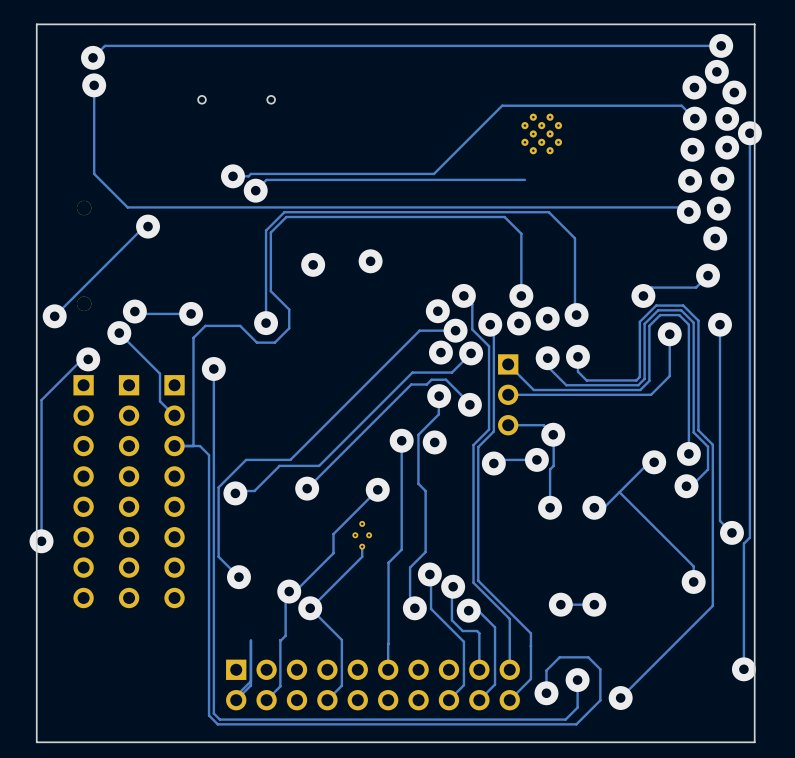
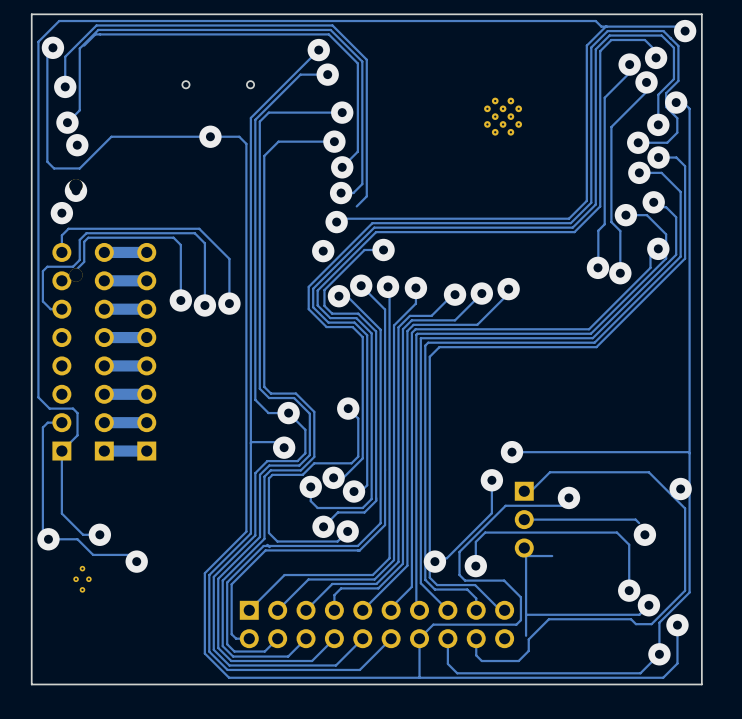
track: none -> (605, 26) (586, 45) (586, 200) (568, 218) (344, 218) (341, 222) (336, 222)
track: none -> (685, 31) (680, 26) (601, 26) (595, 21) (59, 21) (38, 41) (38, 397) (49, 408) (73, 408) (77, 413) (77, 435) (61, 451) (61, 513) (83, 534) (99, 534)
via: none -> (685, 31)
track: (721, 45) (355, 45) -> (342, 167) (357, 151) (357, 63) (328, 34)
via: (721, 45) -> none
via: (92, 57) -> none
track: none -> (52, 47) (47, 53) (47, 161) (54, 168) (79, 168) (111, 136) (239, 136) (246, 143) (246, 531) (204, 573) (204, 653) (229, 677) (663, 677) (677, 663) (677, 625)
via: none -> (52, 47)
track: none -> (318, 50) (250, 117) (250, 533) (209, 575) (209, 651) (227, 669) (359, 669) (391, 638)
via: none -> (318, 50)
track: none -> (656, 57) (656, 51) (644, 40) (611, 40) (600, 51) (600, 206) (574, 232) (376, 232) (317, 290) (317, 305) (330, 318) (356, 318) (371, 333) (371, 499) (362, 508) (317, 508) (310, 501) (310, 486)
via: none -> (656, 57)
via: (716, 71) -> none
track: none -> (629, 64) (629, 72) (604, 97) (604, 224) (598, 230) (598, 262)
via: none -> (629, 64)
track: (94, 85) (94, 173) (127, 207) (684, 207) (688, 211) -> none
via: (94, 85) -> none
via: (694, 87) -> none
track: none -> (327, 74) (300, 74) (255, 119) (255, 399) (268, 413) (288, 413) (305, 429) (305, 453) (297, 461) (267, 461) (255, 473) (255, 535) (213, 576) (213, 649) (229, 665) (335, 665) (362, 638)
via: none -> (327, 74)
via: (734, 92) -> none
track: none -> (646, 82) (646, 91) (611, 127) (611, 222) (620, 231) (620, 273)
via: none -> (646, 82)
track: none -> (65, 86) (65, 56) (96, 25) (332, 25) (366, 59) (366, 196) (356, 206)
via: none -> (65, 86)
track: (694, 118) (681, 105) (502, 105) (434, 173) (250, 173) (248, 176) (232, 176) -> none
via: (694, 118) -> none
track: none -> (685, 101) (689, 108) (689, 592) (659, 622) (659, 654) (640, 673) (457, 673) (447, 663) (447, 638)
via: none -> (342, 112)
track: (749, 133) (749, 537) (743, 543) (743, 669) -> none
via: (749, 133) -> none
track: none -> (67, 122) (79, 110) (79, 48) (98, 29) (330, 29) (362, 61) (362, 184) (353, 193) (341, 193)
via: none -> (67, 122)
track: none -> (658, 124) (658, 94) (673, 79) (673, 47) (661, 35) (609, 35) (595, 49) (595, 204) (572, 227) (374, 227) (313, 288) (313, 307) (328, 322) (354, 322) (367, 335) (367, 485) (360, 491) (354, 491)
via: none -> (658, 124)
via: (727, 147) -> none
via: (692, 149) -> none
track: none -> (334, 141) (278, 141) (264, 155) (264, 386) (270, 393) (295, 393) (314, 411) (314, 456) (300, 470) (270, 470) (264, 476) (264, 538) (222, 580) (222, 646) (233, 656) (288, 656) (306, 638)
via: none -> (334, 141)
track: none -> (638, 142) (667, 142) (677, 132) (677, 118) (666, 107) (666, 93) (678, 80) (678, 45) (663, 31) (607, 31) (591, 47) (591, 202) (570, 223) (372, 223) (308, 286) (308, 309) (326, 327) (352, 327) (362, 337) (362, 458) (343, 477) (333, 477)
via: none -> (638, 142)
via: none -> (77, 145)
via position: (232, 176) -> (210, 136)
track: none -> (658, 157) (676, 157) (685, 166) (685, 258) (596, 347) (439, 347) (429, 356) (429, 577) (437, 585) (475, 585) (500, 610) (504, 610)
via: none -> (658, 157)
via: (722, 178) -> none
track: (524, 179) (266, 179) (255, 190) -> none
via: (690, 180) -> none
via: none -> (342, 167)
via: (255, 190) -> none
track: none -> (639, 172) (661, 172) (680, 191) (680, 256) (594, 342) (428, 342) (425, 345) (425, 579) (434, 589) (467, 589) (476, 598) (476, 610)
via: none -> (639, 172)
via: (718, 208) -> none
via: (688, 211) -> none
via: none -> (75, 190)
via: none -> (341, 193)
track: none -> (653, 202) (658, 207) (666, 207) (676, 217) (676, 254) (592, 338) (420, 338) (420, 583) (447, 610)
via: none -> (653, 202)
track: (148, 226) (144, 226) (54, 316) -> none
via: (148, 226) -> none
via: none -> (61, 213)
via: (715, 238) -> none
track: none -> (625, 215) (646, 215) (666, 234) (666, 258) (590, 333) (416, 334) (416, 607) (419, 610)
via: none -> (625, 215)
via: none -> (336, 222)
via: (370, 261) -> none
via: (313, 264) -> none
track: none -> (650, 242) (650, 267) (589, 329) (415, 329) (411, 332) (411, 586) (391, 607) (391, 610)
track: (708, 275) (696, 287) (651, 287) (643, 295) -> none
via: none -> (383, 249)
via: none -> (323, 251)
track: none -> (61, 252) (61, 235) (68, 228) (199, 228) (229, 258) (229, 303)
track: none -> (146, 252) (104, 252)
track: (463, 295) (472, 304) (472, 329) (489, 346) (489, 429) (473, 445) (473, 582) (509, 619) (509, 669) -> none
via: (463, 295) -> none
track: (521, 295) (521, 233) (504, 217) (286, 217) (270, 232) (270, 291) (289, 309) (289, 328) (274, 342) (256, 342) (240, 325) (205, 325) (193, 337) (193, 446) -> none
via: (521, 295) -> none
via: none -> (620, 273)
track: none -> (61, 280) (65, 280) (84, 261) (84, 241) (88, 237) (173, 237) (180, 244) (180, 300)
track: none -> (146, 280) (104, 280)
track: none -> (508, 281) (508, 293) (477, 324) (413, 324) (407, 331) (407, 565) (362, 610)
via: (134, 311) -> none
via: (437, 311) -> none
track: (191, 313) (137, 313) -> none
via position: (191, 313) -> (180, 300)
track: none -> (361, 285) (385, 309) (385, 525) (359, 550) (265, 550) (231, 584) (231, 589)
via: none -> (361, 285)
track: (576, 315) (574, 313) (574, 238) (548, 212) (284, 212) (266, 230) (266, 323) -> none
via: (576, 315) -> none
via: (54, 316) -> none
track: none -> (388, 286) (389, 288) (389, 558) (372, 575) (284, 575) (249, 610)
via: none -> (388, 286)
track: none -> (415, 287) (415, 303) (394, 325) (394, 560) (374, 579) (308, 579) (277, 610)
via: none -> (415, 287)
track: none -> (457, 290) (431, 315) (409, 315) (398, 327) (398, 561) (376, 583) (332, 583) (306, 610)
track: none -> (484, 291) (455, 320) (411, 320) (402, 329) (402, 563) (378, 588) (341, 588) (334, 595) (334, 610)
via position: (266, 323) -> (229, 303)
track: (490, 324) (493, 328) (493, 431) (478, 447) (478, 580) (530, 633) (530, 679) (509, 700) -> none
track: (719, 324) (719, 520) (731, 532) -> none
via: (719, 324) -> none
track: none -> (338, 296) (347, 296) (380, 329) (380, 523) (357, 545) (263, 545) (227, 582) (227, 644) (234, 651) (264, 651) (277, 638)
via: none -> (338, 296)
track: (455, 330) (419, 330) (290, 459) (246, 459) (218, 487) (218, 556) (238, 577) -> none
via: (455, 330) -> none
track: (119, 333) (159, 373) (159, 401) (174, 415) -> none
via: (119, 333) -> none
track: (669, 334) (669, 376) (651, 394) (508, 394) -> none
via: (669, 334) -> none
track: none -> (204, 305) (204, 243) (194, 233) (86, 233) (79, 239) (79, 260) (73, 266) (47, 266) (42, 271) (42, 301) (50, 309) (61, 309)
via: none -> (204, 305)
track: none -> (146, 309) (104, 309)
via: (440, 352) -> none
track: (471, 353) (451, 372) (412, 372) (319, 465) (279, 465) (254, 491) (237, 491) -> none
via: (471, 353) -> none
track: (577, 356) (577, 371) (586, 380) (636, 380) (639, 376) (639, 321) (656, 305) (683, 305) (698, 320) (698, 430) (712, 444) (712, 605) (620, 698) -> none
via: (577, 356) -> none
track: (547, 358) (545, 364) (566, 385) (638, 385) (644, 378) (644, 323) (658, 310) (681, 310) (693, 322) (693, 432) (708, 446) (708, 469) (691, 486) (686, 486) -> none
via: (547, 358) -> none
track: (88, 359) (82, 359) (41, 400) (41, 541) -> none
via: (88, 359) -> none
track: (508, 364) (533, 390) (640, 390) (649, 380) (649, 325) (660, 315) (679, 315) (688, 324) (688, 453) -> none
track: (213, 368) (213, 713) (219, 719) (565, 719) (577, 707) (577, 680) -> none
via: (213, 368) -> none
track: none -> (146, 337) (104, 337)
part: none -> (61, 351)
part: none -> (104, 351)
part: none -> (146, 351)
part position: (508, 394) -> (524, 519)
track: (438, 396) (438, 414) (418, 434) (418, 483) (425, 491) (425, 552) (410, 567) (410, 603) (414, 608) -> none
via: (439, 396) -> none
track: none -> (146, 365) (104, 365)
track: (469, 404) (445, 379) (431, 379) (426, 384) (411, 384) (307, 488) -> none
via: (469, 404) -> none
track: (508, 425) (543, 425) (553, 434) (553, 465) (550, 469) (550, 507) -> none
track: none -> (146, 394) (104, 394)
via: (553, 434) -> none
track: (401, 440) (401, 549) -> (383, 249) (364, 249) (324, 290) (324, 305) (332, 313) (358, 313) (376, 331) (376, 500) (372, 504)
via: (401, 440) -> none
via: (434, 442) -> none
track: (174, 446) (199, 446) (209, 455) (209, 715) (217, 724) (576, 724) (600, 700) (600, 669) (588, 657) (559, 657) (546, 670) (546, 693) -> none
track: none -> (348, 408) (358, 418) (358, 456) (351, 463) (314, 463) (302, 474) (272, 474) (268, 478) (268, 532) (277, 541) (337, 541) (347, 531)
via: none -> (348, 408)
via: none -> (288, 413)
via: (688, 453) -> none
track: (536, 459) (497, 459) (493, 463) -> none
via: (536, 459) -> none
track: none -> (61, 422) (47, 422) (42, 427) (42, 533) (48, 539) (77, 539) (93, 554) (130, 554) (136, 561)
track: none -> (146, 422) (104, 422)
track: (649, 462) (603, 507) (594, 507) -> none
via: (654, 462) -> none
via: (493, 463) -> none
track: none -> (284, 442) (250, 442)
via: (686, 486) -> none
track: (377, 489) (333, 534) (333, 553) (285, 601) (285, 635) (280, 640) (280, 686) (266, 700) -> none
via: (377, 489) -> none
part: (83, 491) -> none
part: (129, 491) -> none
part: (174, 491) -> none
track: none -> (146, 451) (104, 451)
track: (619, 492) (693, 566) (693, 581) -> none
via: (235, 493) -> none
track: none -> (511, 452) (689, 453)
via: none -> (511, 452)
via: (550, 507) -> none
via: (594, 507) -> none
via: none -> (333, 477)
track: none -> (491, 480) (491, 513) (446, 558) (444, 558)
via: none -> (491, 480)
via: none -> (310, 486)
part position: (362, 535) -> (82, 579)
via: none -> (354, 491)
track: none -> (524, 491) (530, 491) (549, 472) (648, 472) (685, 508) (685, 590) (651, 624) (635, 624) (631, 619) (548, 619) (528, 639) (528, 650) (518, 661) (481, 661) (476, 655) (476, 638)
via: (41, 541) -> none
track: none -> (568, 497) (561, 505) (505, 505) (459, 551) (459, 575) (465, 580) (504, 580) (520, 597) (520, 620) (516, 624) (433, 624) (419, 638) (419, 677)
via: none -> (568, 497)
track: (362, 546) (362, 556) (310, 608) (341, 639) (341, 685) (327, 700) -> none
track: (393, 558) (388, 562) (388, 669) -> (364, 512) (337, 512) (323, 526)
track: none -> (524, 519) (635, 519) (639, 523)
via: none -> (323, 526)
track: (429, 574) (431, 608) (463, 641) (463, 685) (448, 700) -> none
via: (429, 574) -> none
via: (238, 577) -> none
via: none -> (347, 531)
via: none -> (99, 534)
via: none -> (48, 539)
track: (453, 586) (451, 620) (462, 631) (477, 631) (479, 633) (479, 669) -> none
via: (453, 586) -> none
via: (289, 591) -> none
via: (560, 604) -> none
via: (594, 604) -> none
track: none -> (526, 556) (526, 635)
via: (310, 608) -> none
via: (414, 608) -> none
via: none -> (136, 561)
track: (468, 610) (478, 610) (495, 627) (495, 684) (479, 700) -> none
track: none -> (475, 566) (475, 541) (485, 532) (616, 532) (629, 544) (629, 590)
via: none -> (475, 566)
via: none -> (629, 590)
track: none -> (648, 605) (639, 614) (526, 614)
via: none -> (648, 605)
via position: (743, 669) -> (677, 625)
via: (577, 680) -> none
track: (250, 681) (236, 695) -> (342, 112) (268, 112) (259, 121) (259, 388) (269, 398) (294, 398) (309, 413) (309, 455) (299, 465) (269, 465) (259, 474) (259, 537) (218, 578) (218, 640)
part position: (372, 684) -> (376, 624)
track: (250, 685) (236, 700) -> (231, 631) (236, 638) (249, 638)
track: none -> (334, 638) (312, 661) (231, 661) (218, 647) (218, 645)
via: (546, 693) -> none
via: (620, 698) -> none
via: none -> (659, 654)

